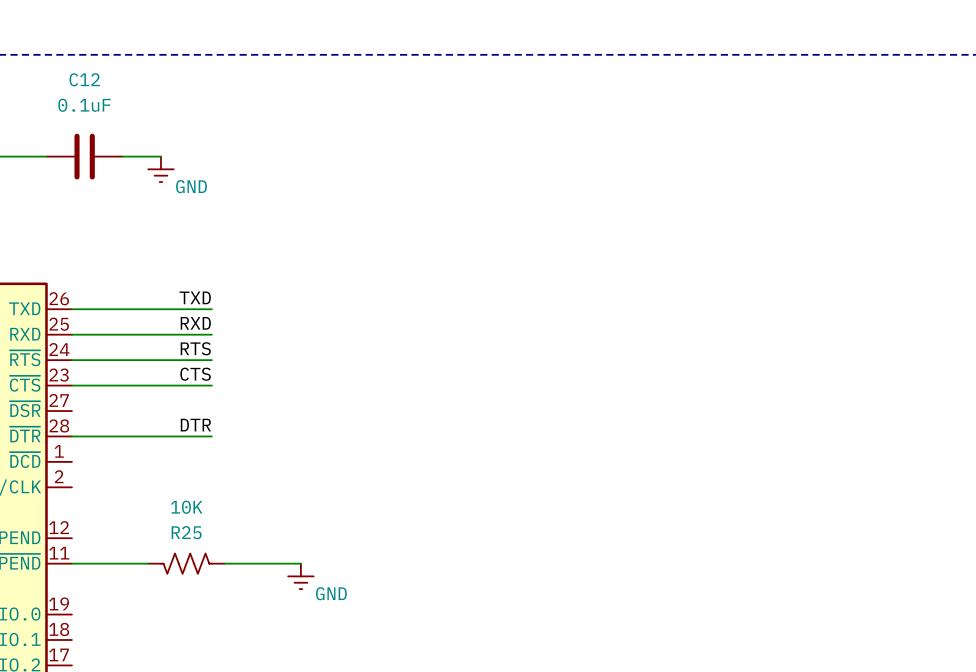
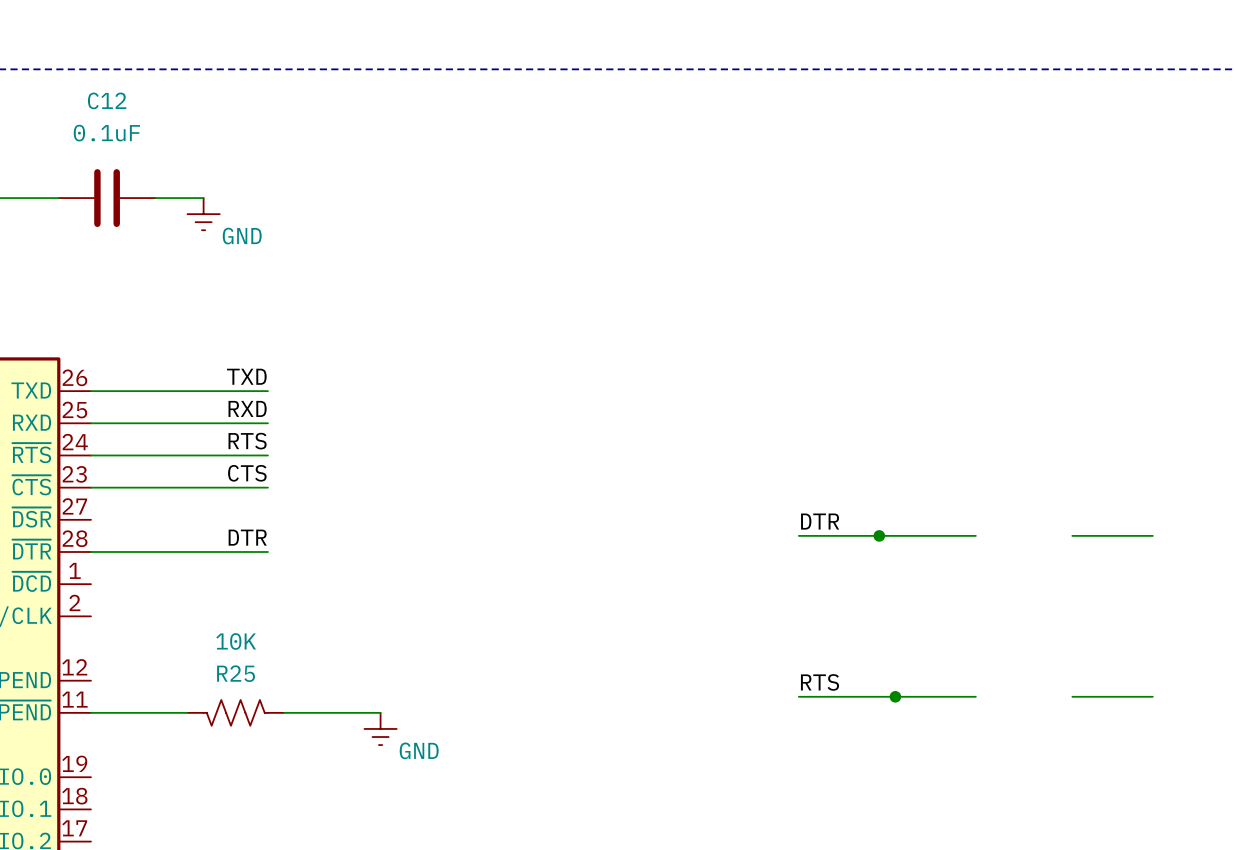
label: none -> DTR (820, 521)
wire: none -> (798, 535) (975, 535)
junction: none -> (879, 535)
wire: none -> (1072, 535) (1152, 535)
label: none -> RTS (819, 682)
wire: none -> (798, 696) (975, 696)
junction: none -> (895, 696)
wire: none -> (1072, 696) (1152, 696)

